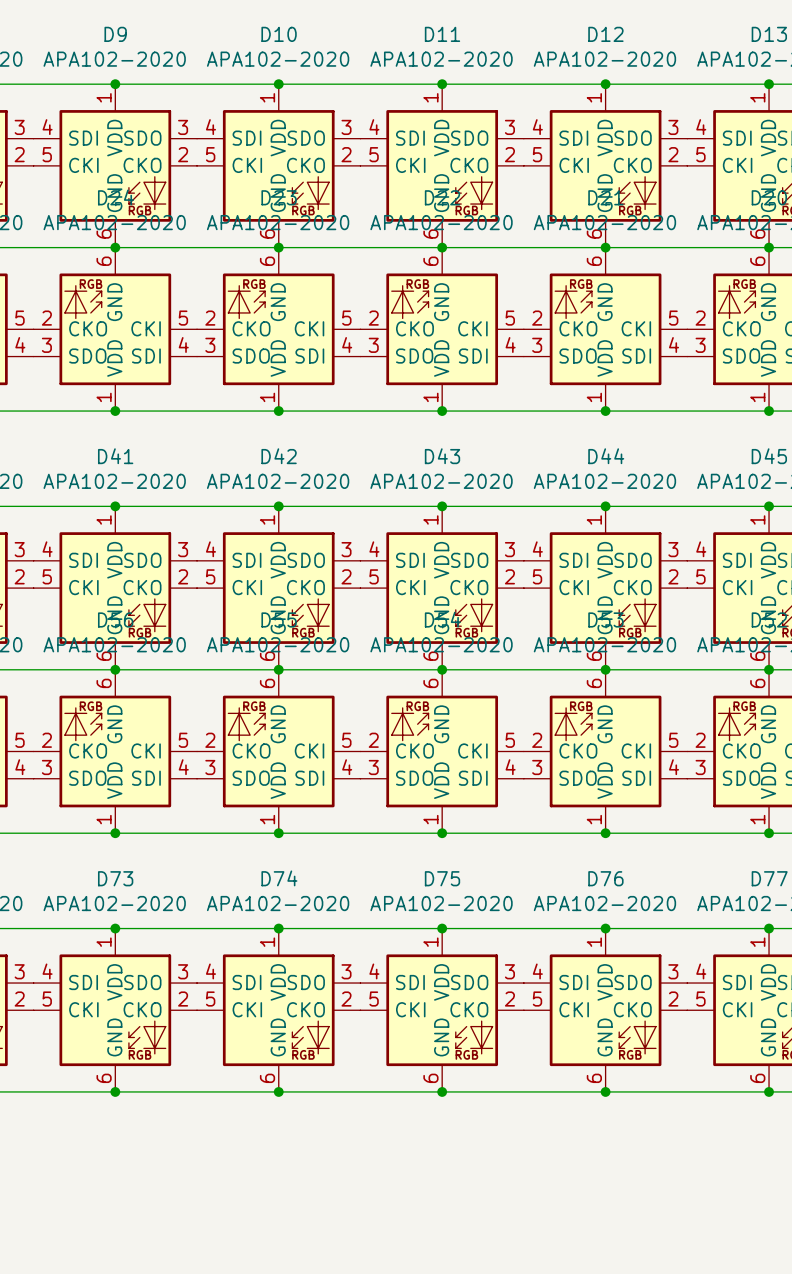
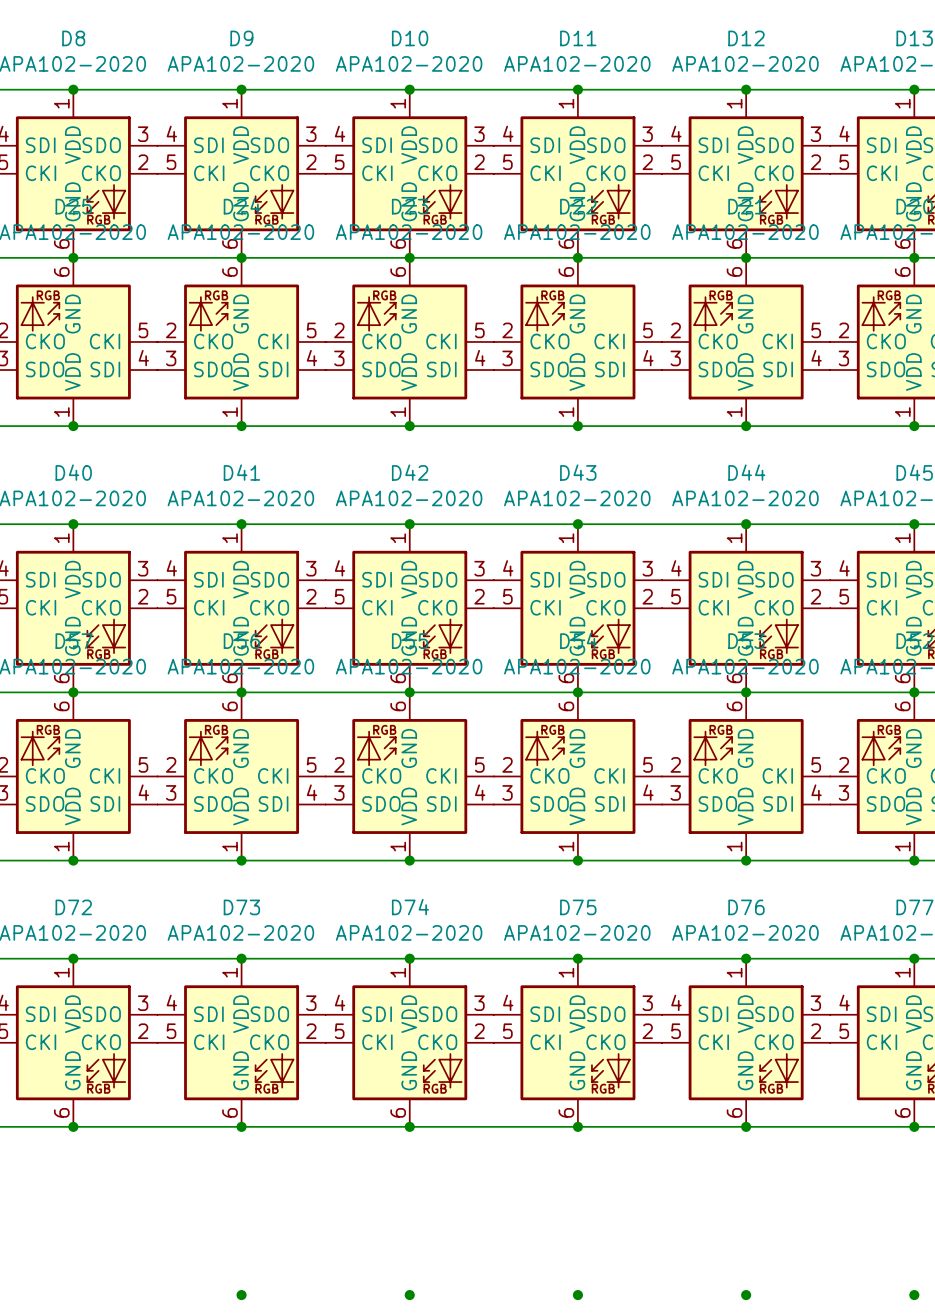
junction: none -> (241, 1295)
junction: none -> (409, 1295)
junction: none -> (577, 1295)
junction: none -> (746, 1295)
junction: none -> (914, 1295)

